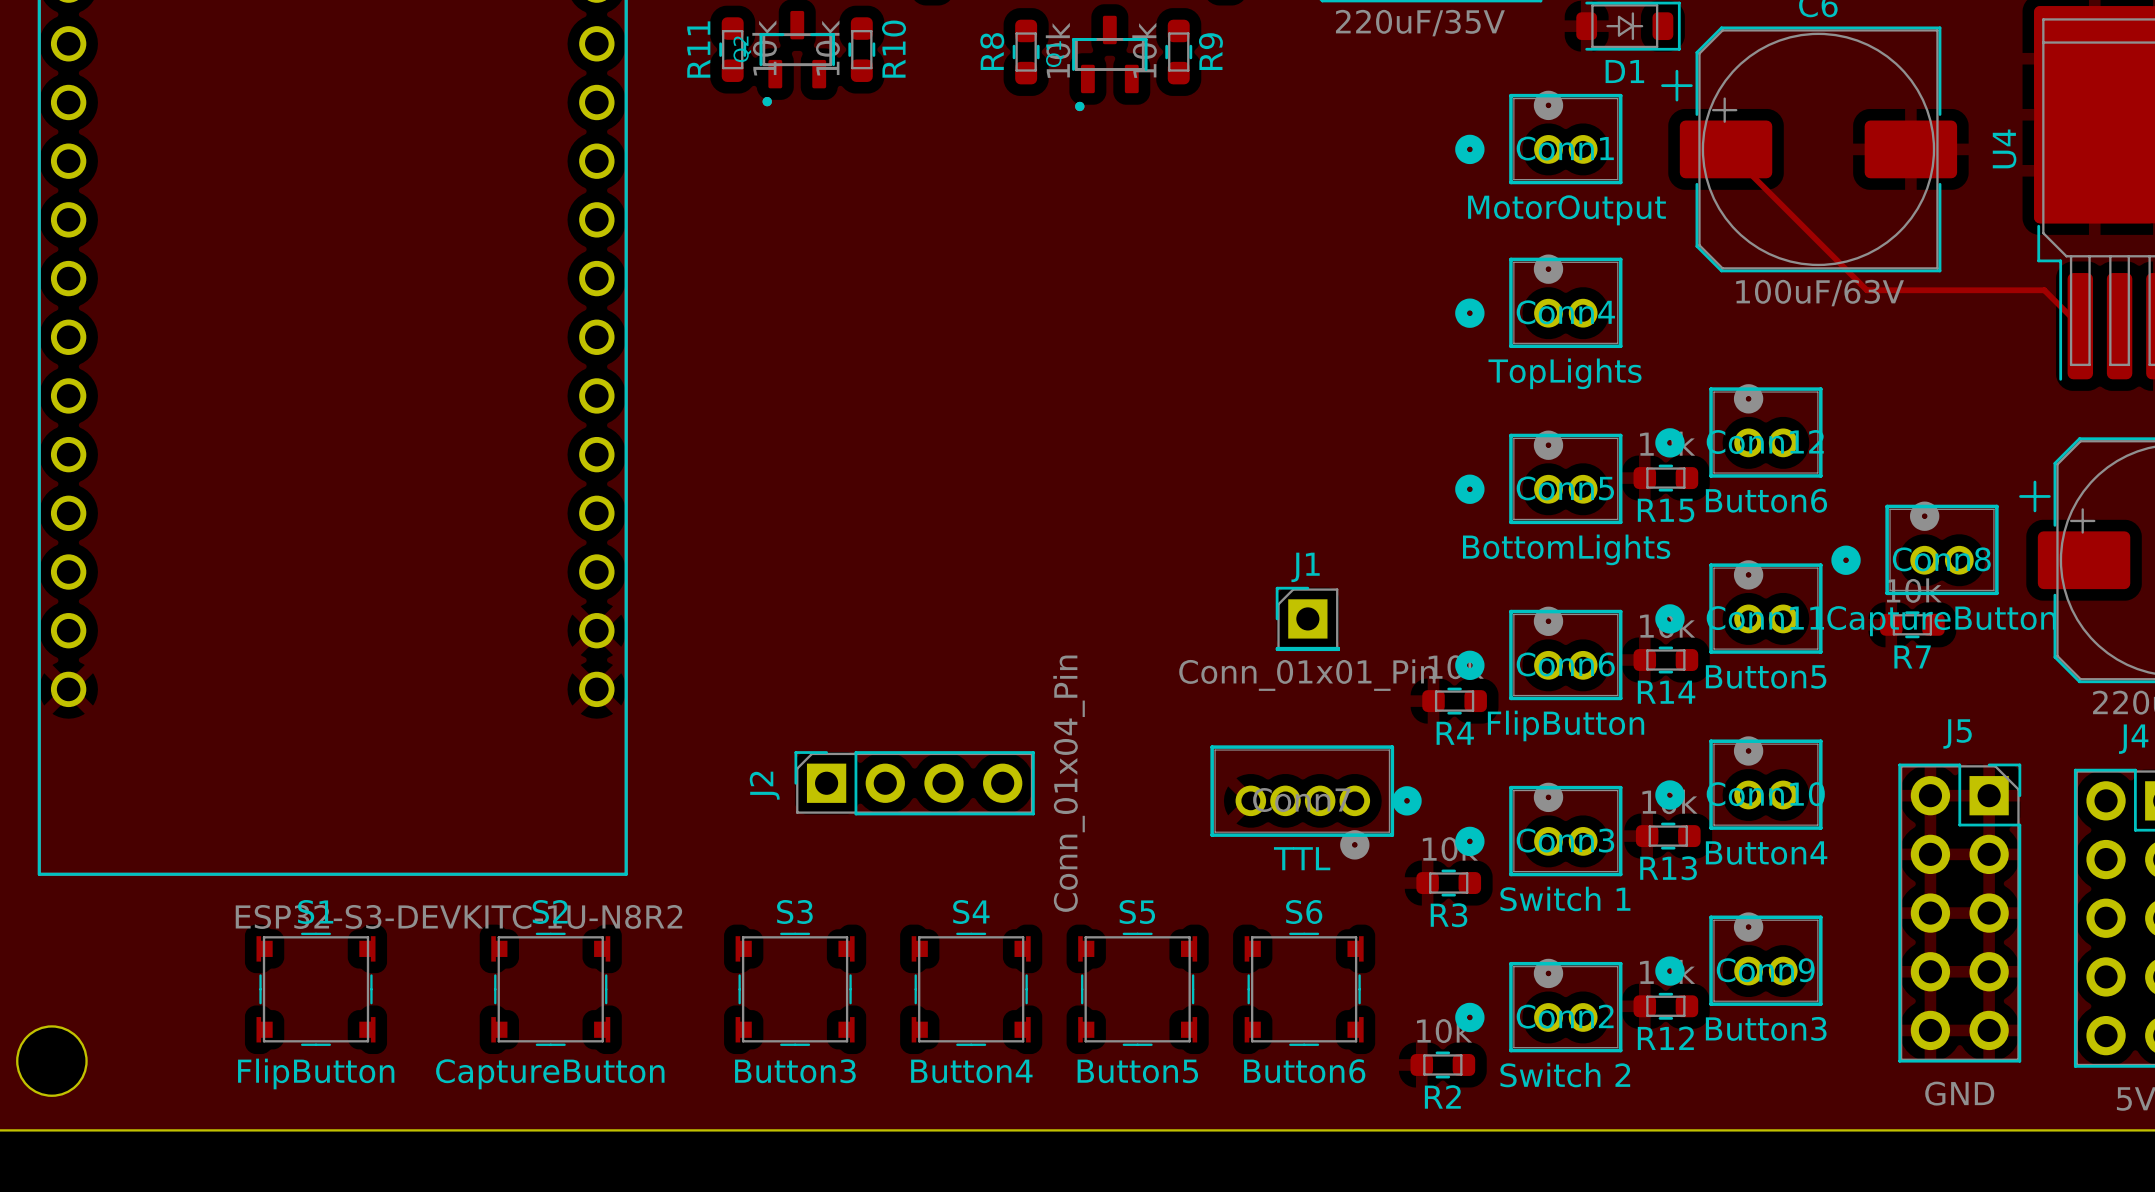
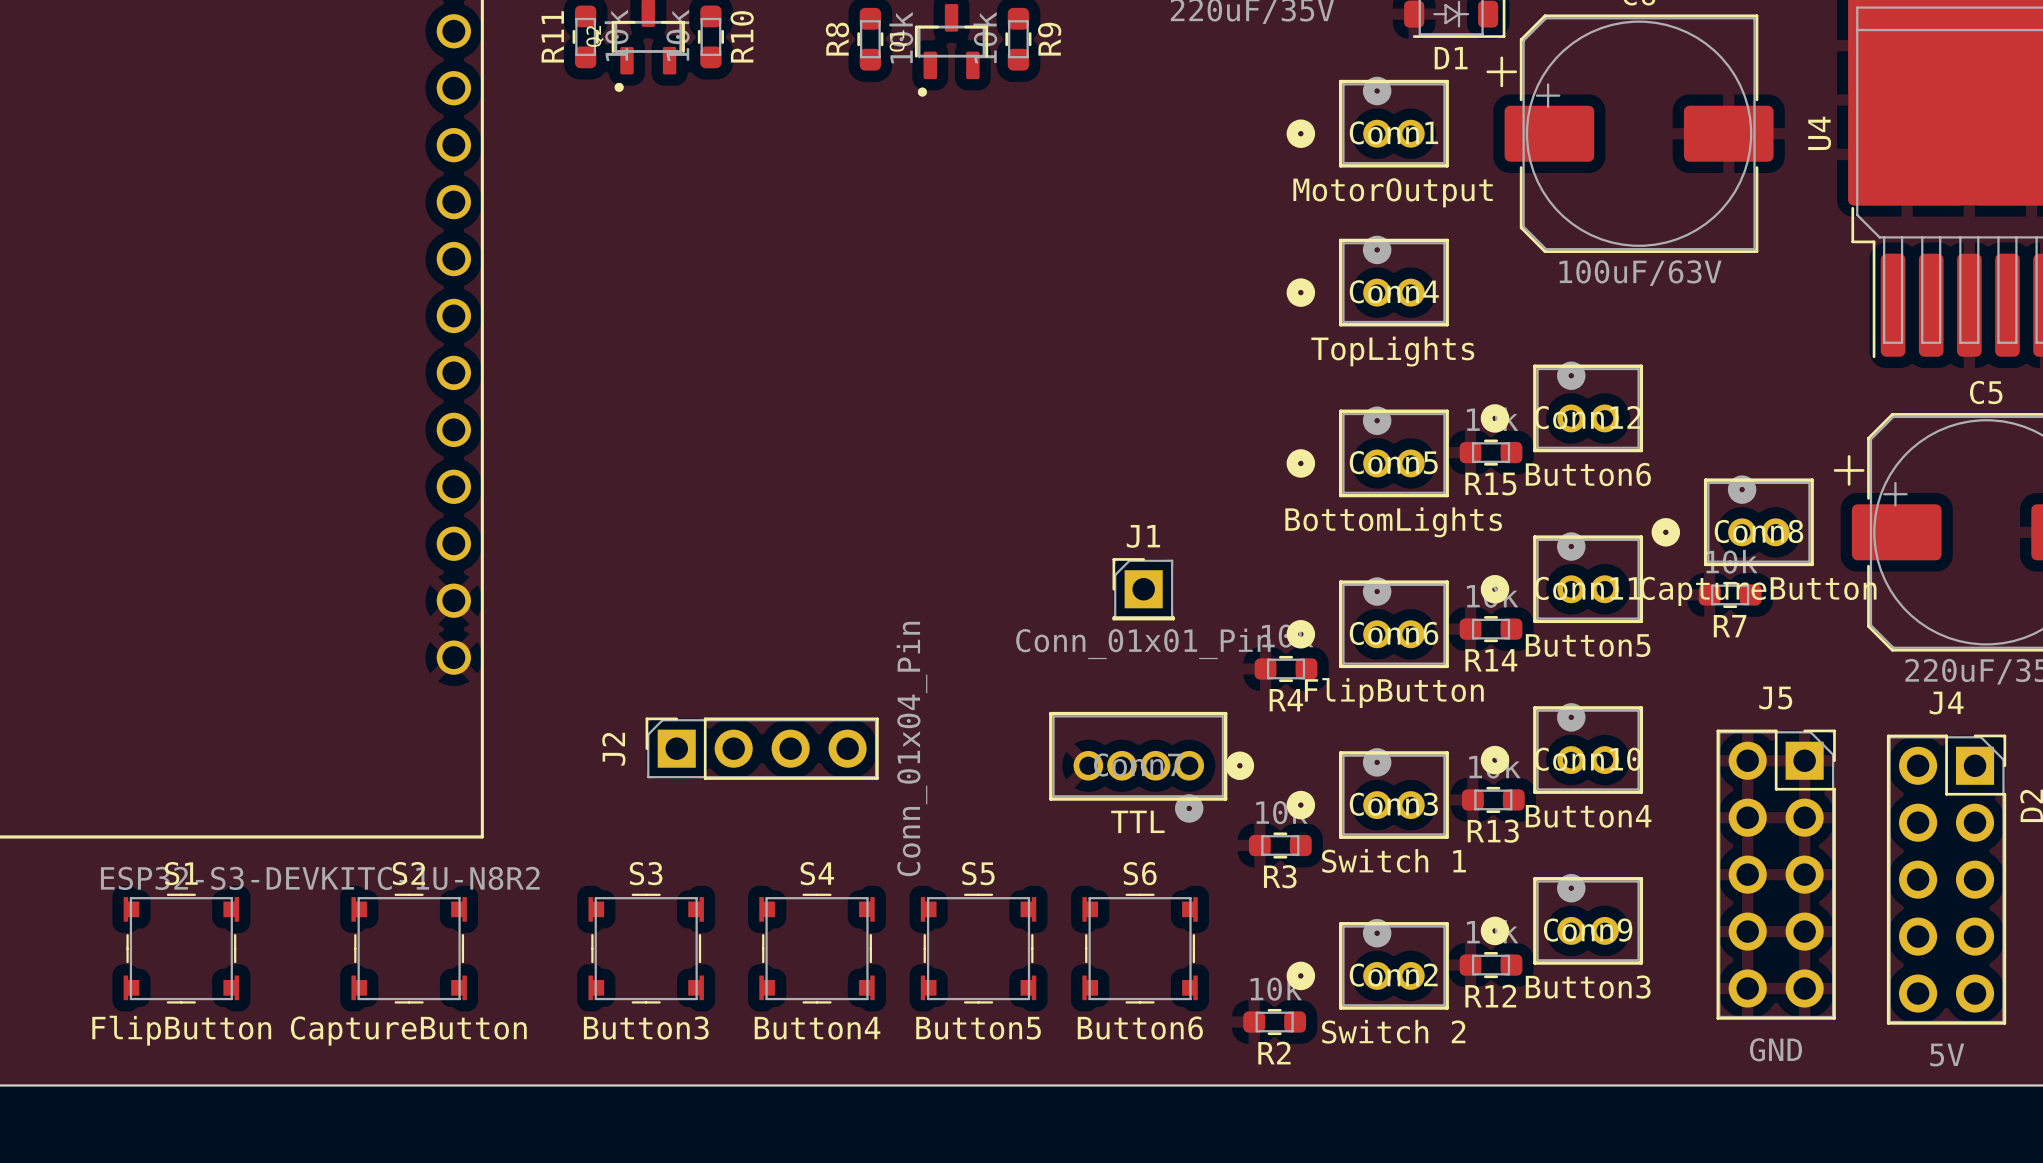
track: (1726, 149) (1866, 290) (2044, 290) (2080, 326) -> none

